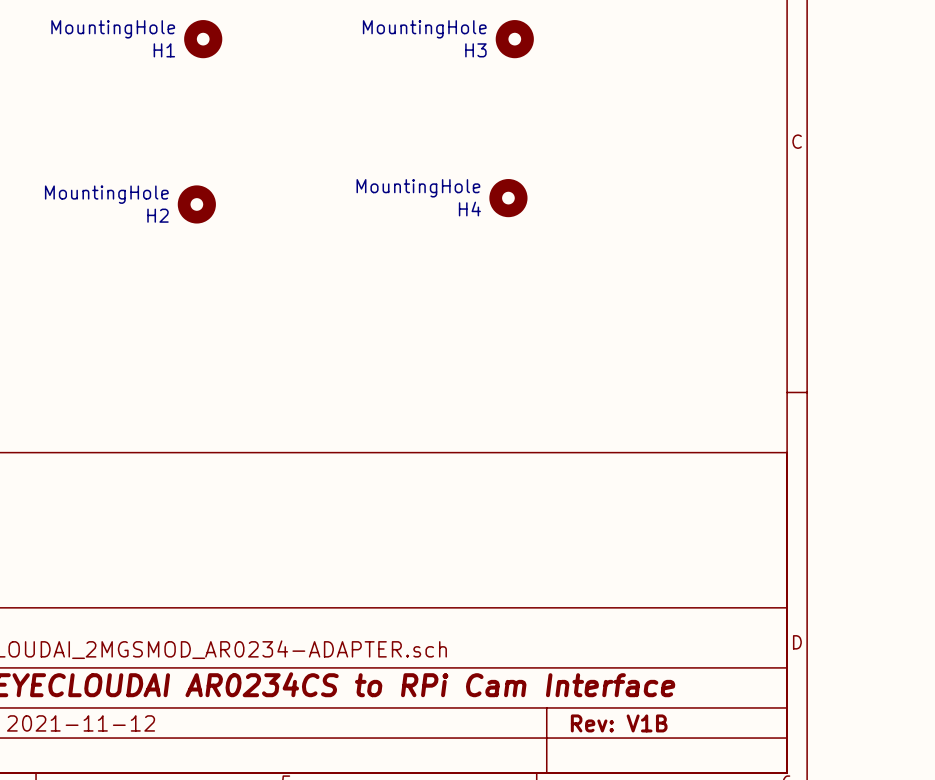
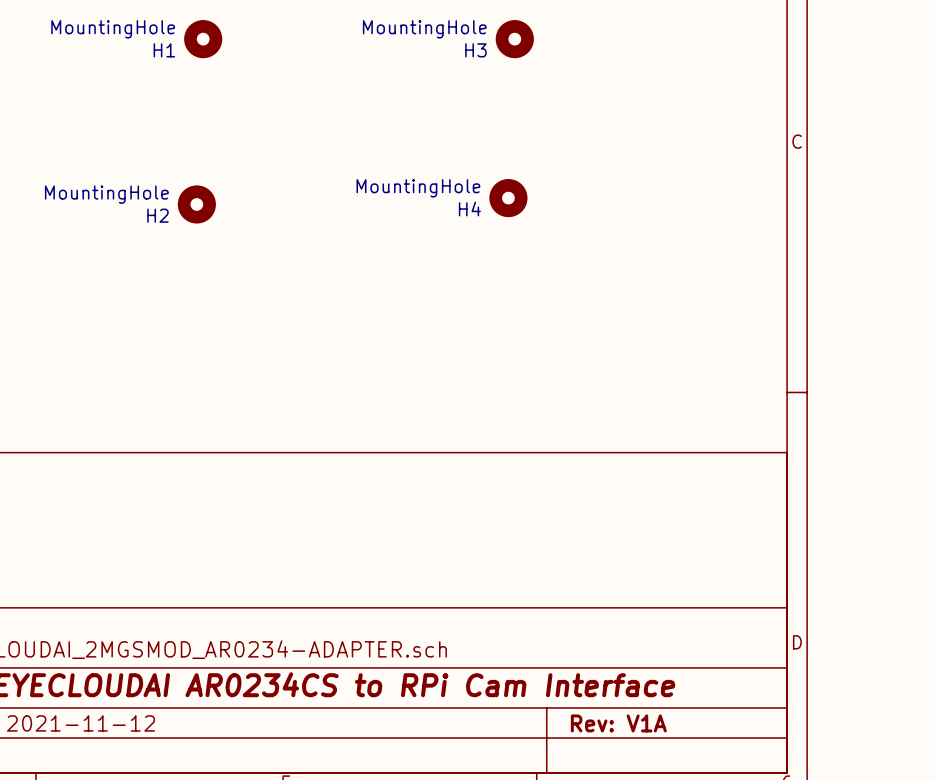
title block: Rev: V1B (619, 723) -> Rev: V1A (618, 723)

